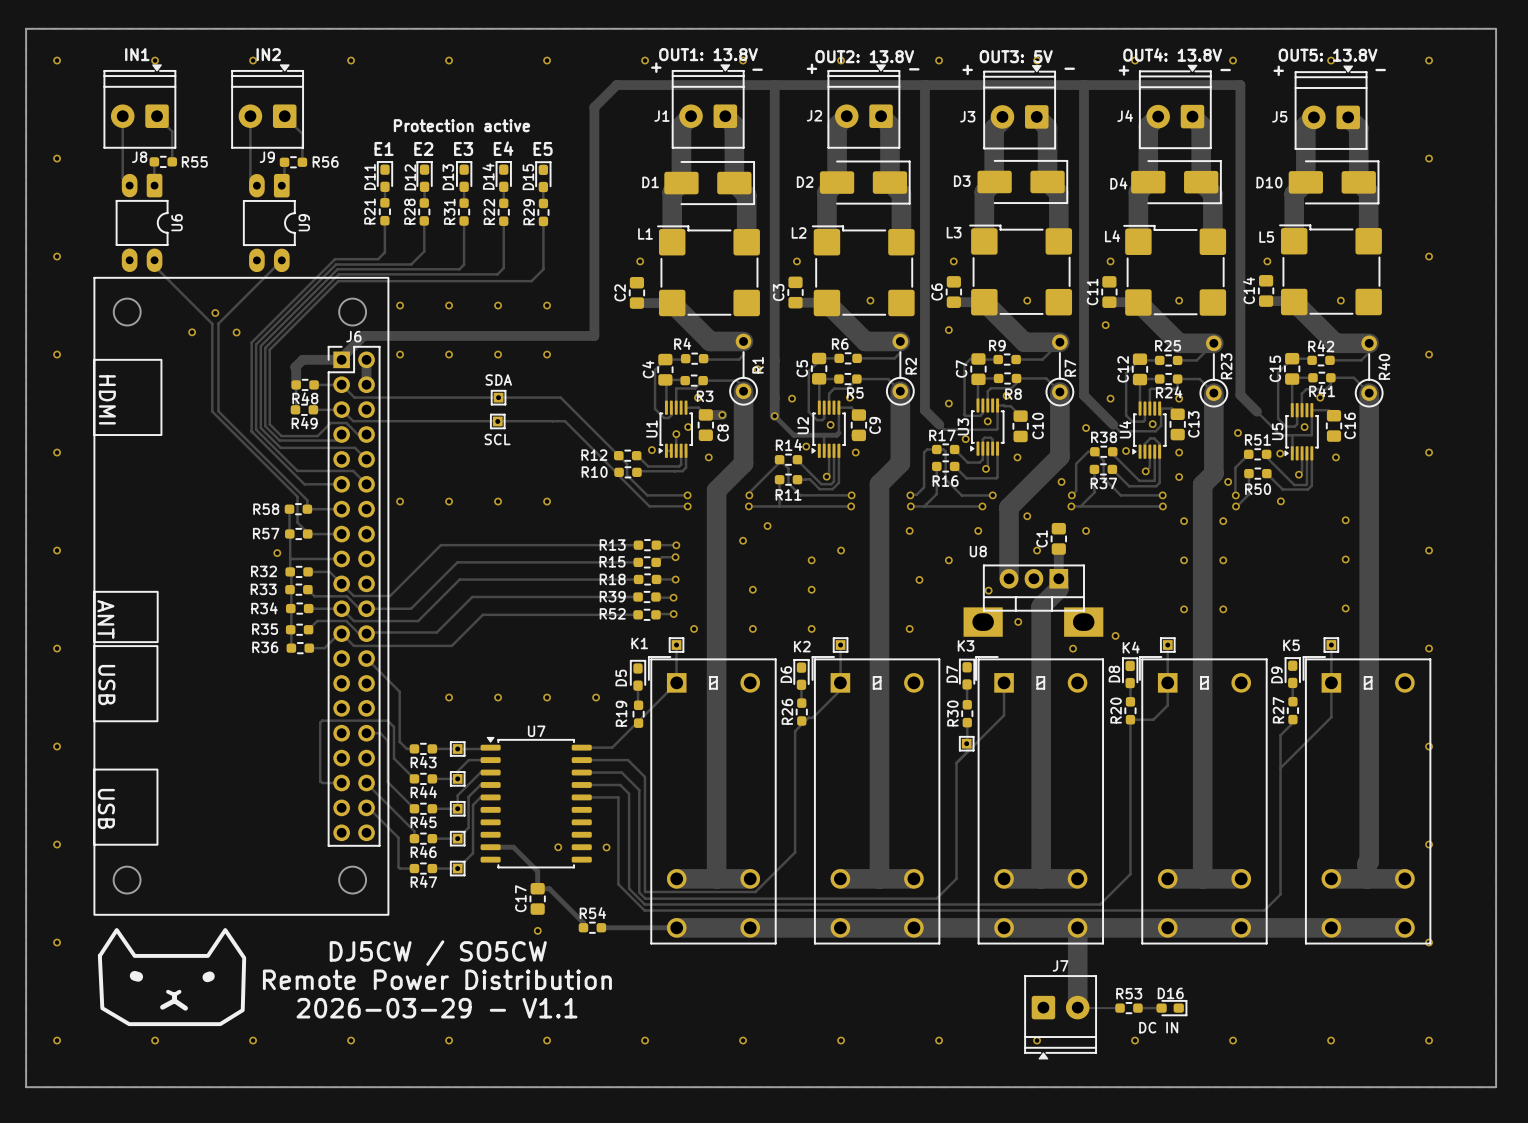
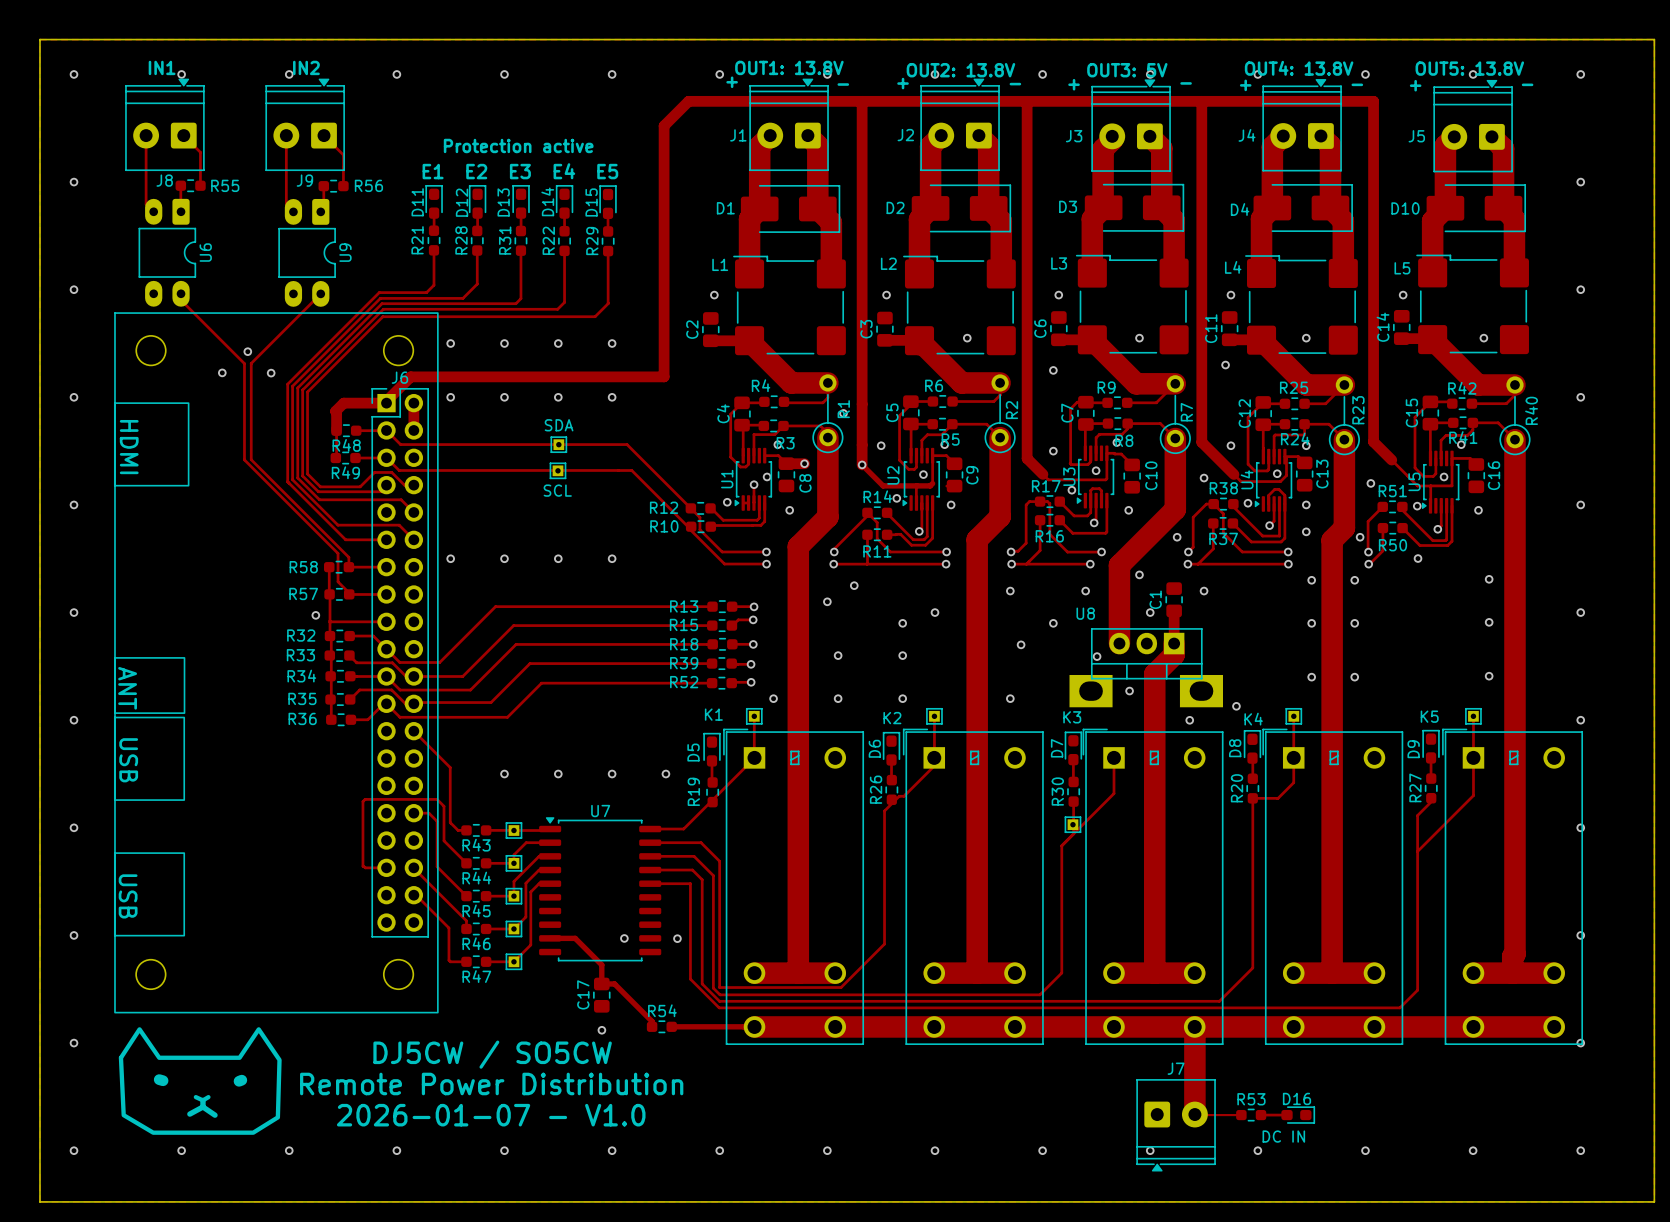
text: 2026-03-29 - V1.1 (436, 1008) -> 2026-01-07 - V1.0 (491, 1115)

